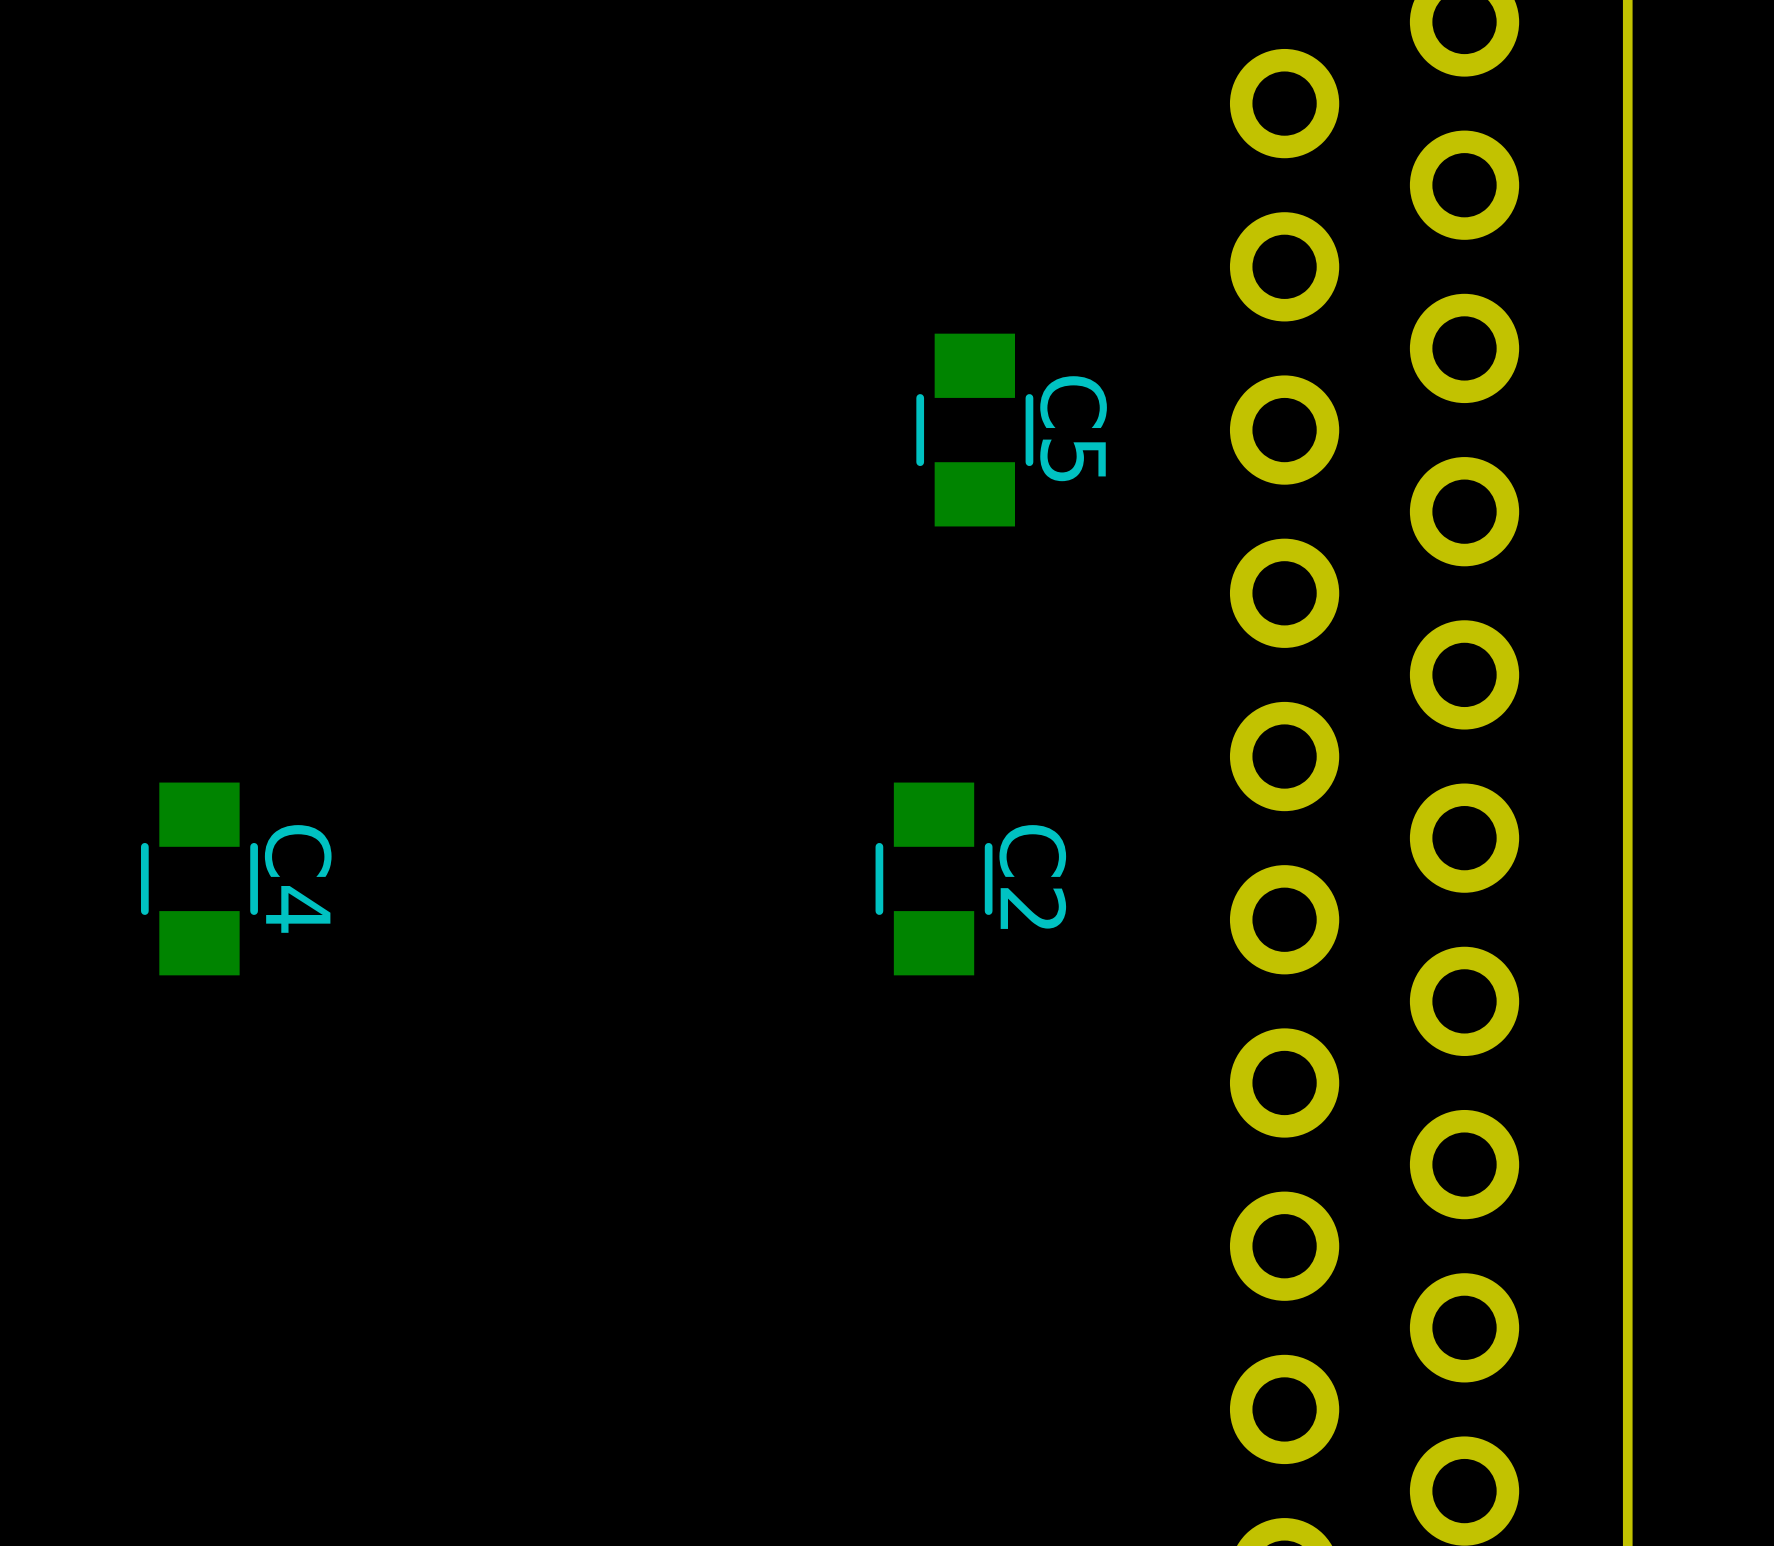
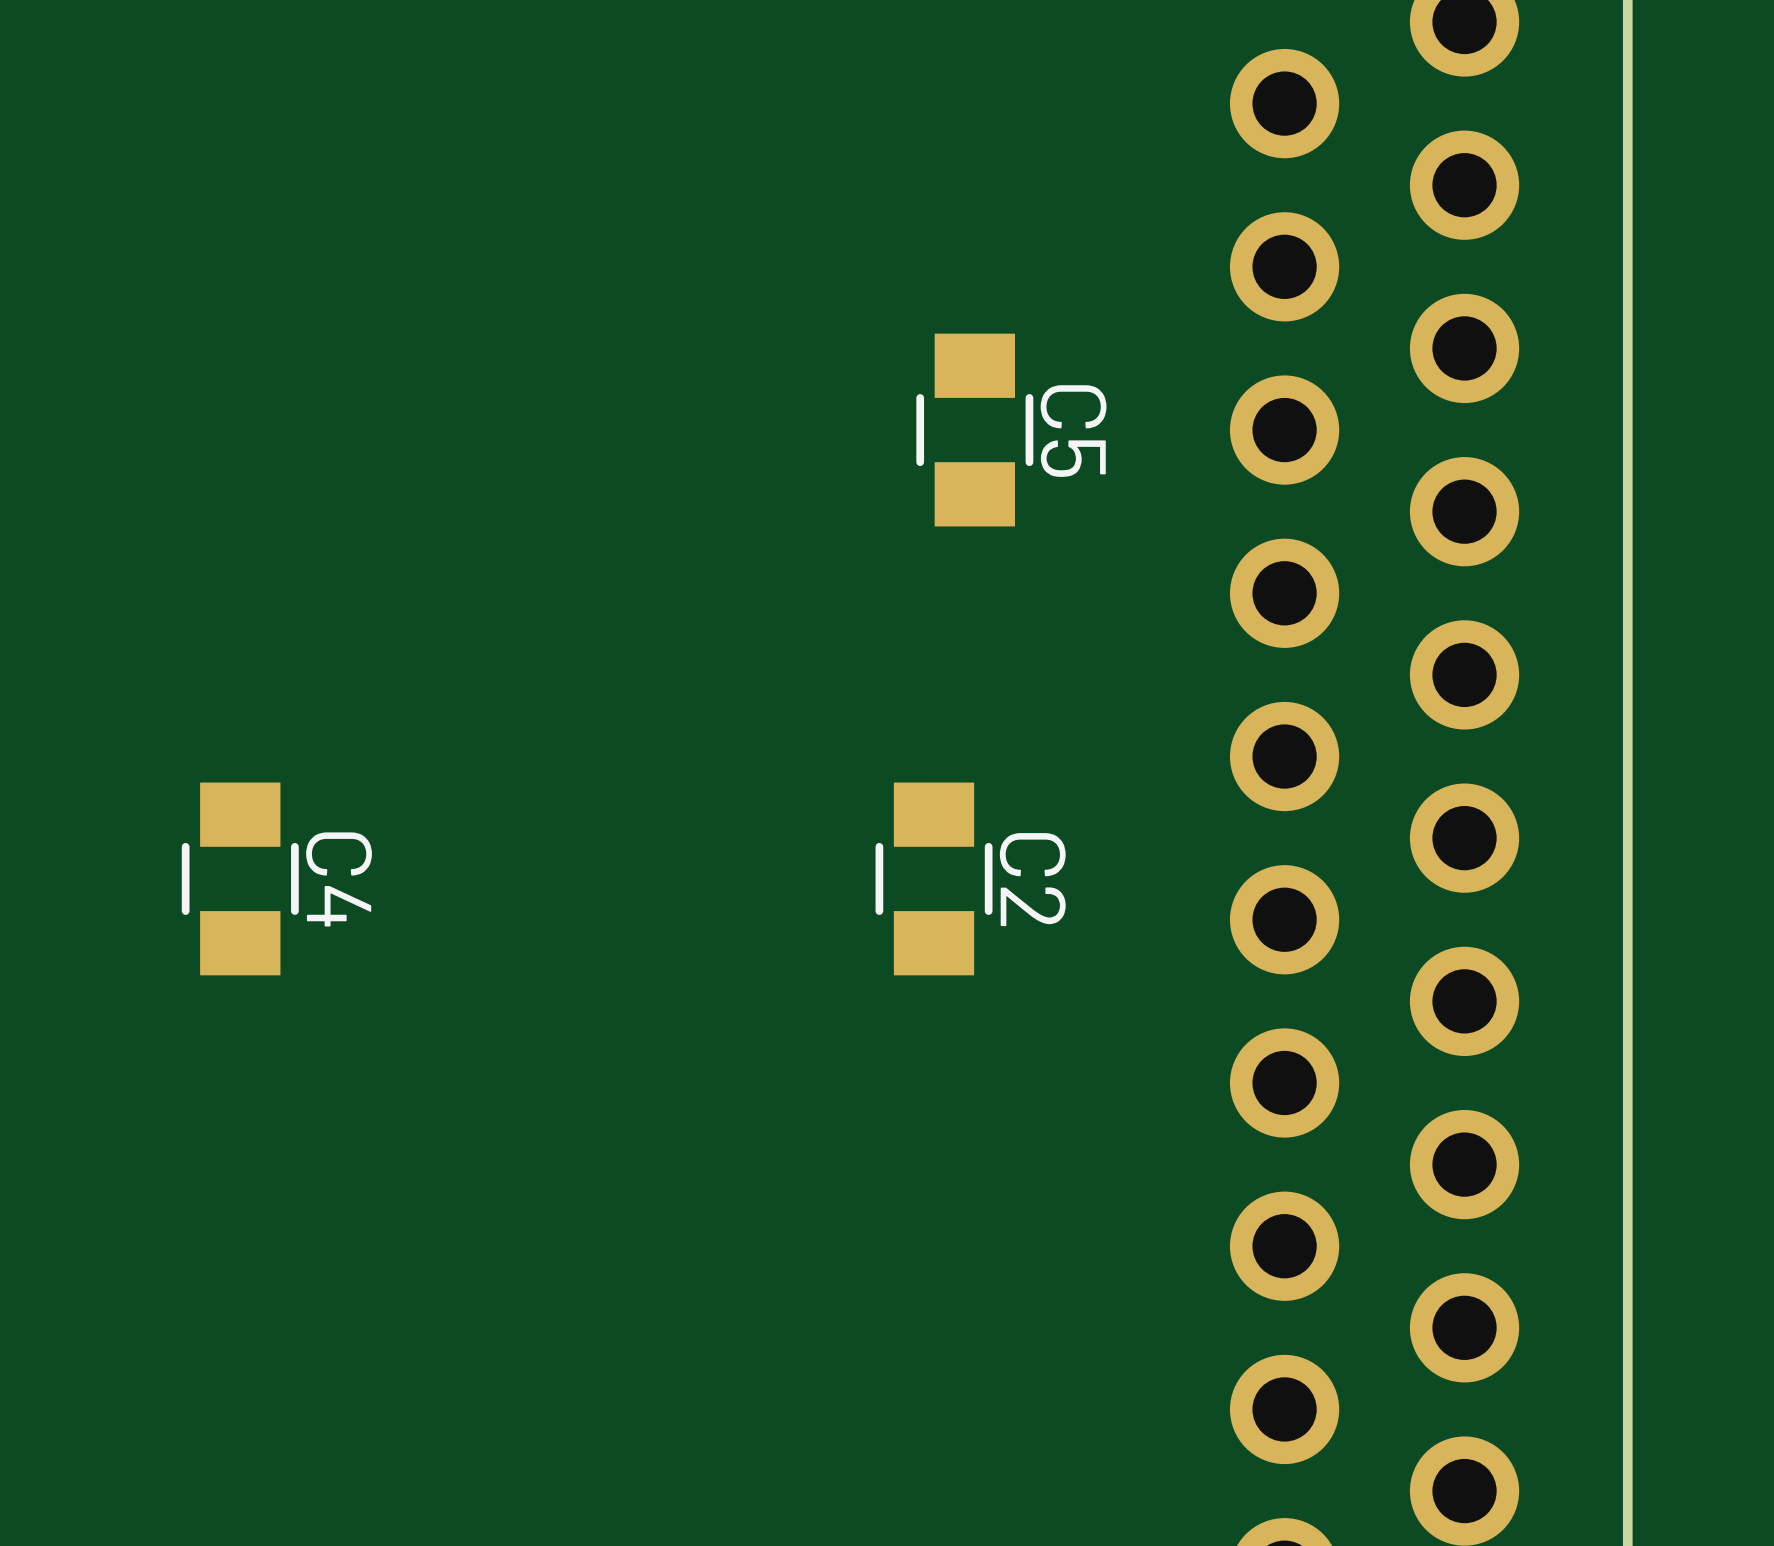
C4 position: (199, 878) -> (240, 878)

